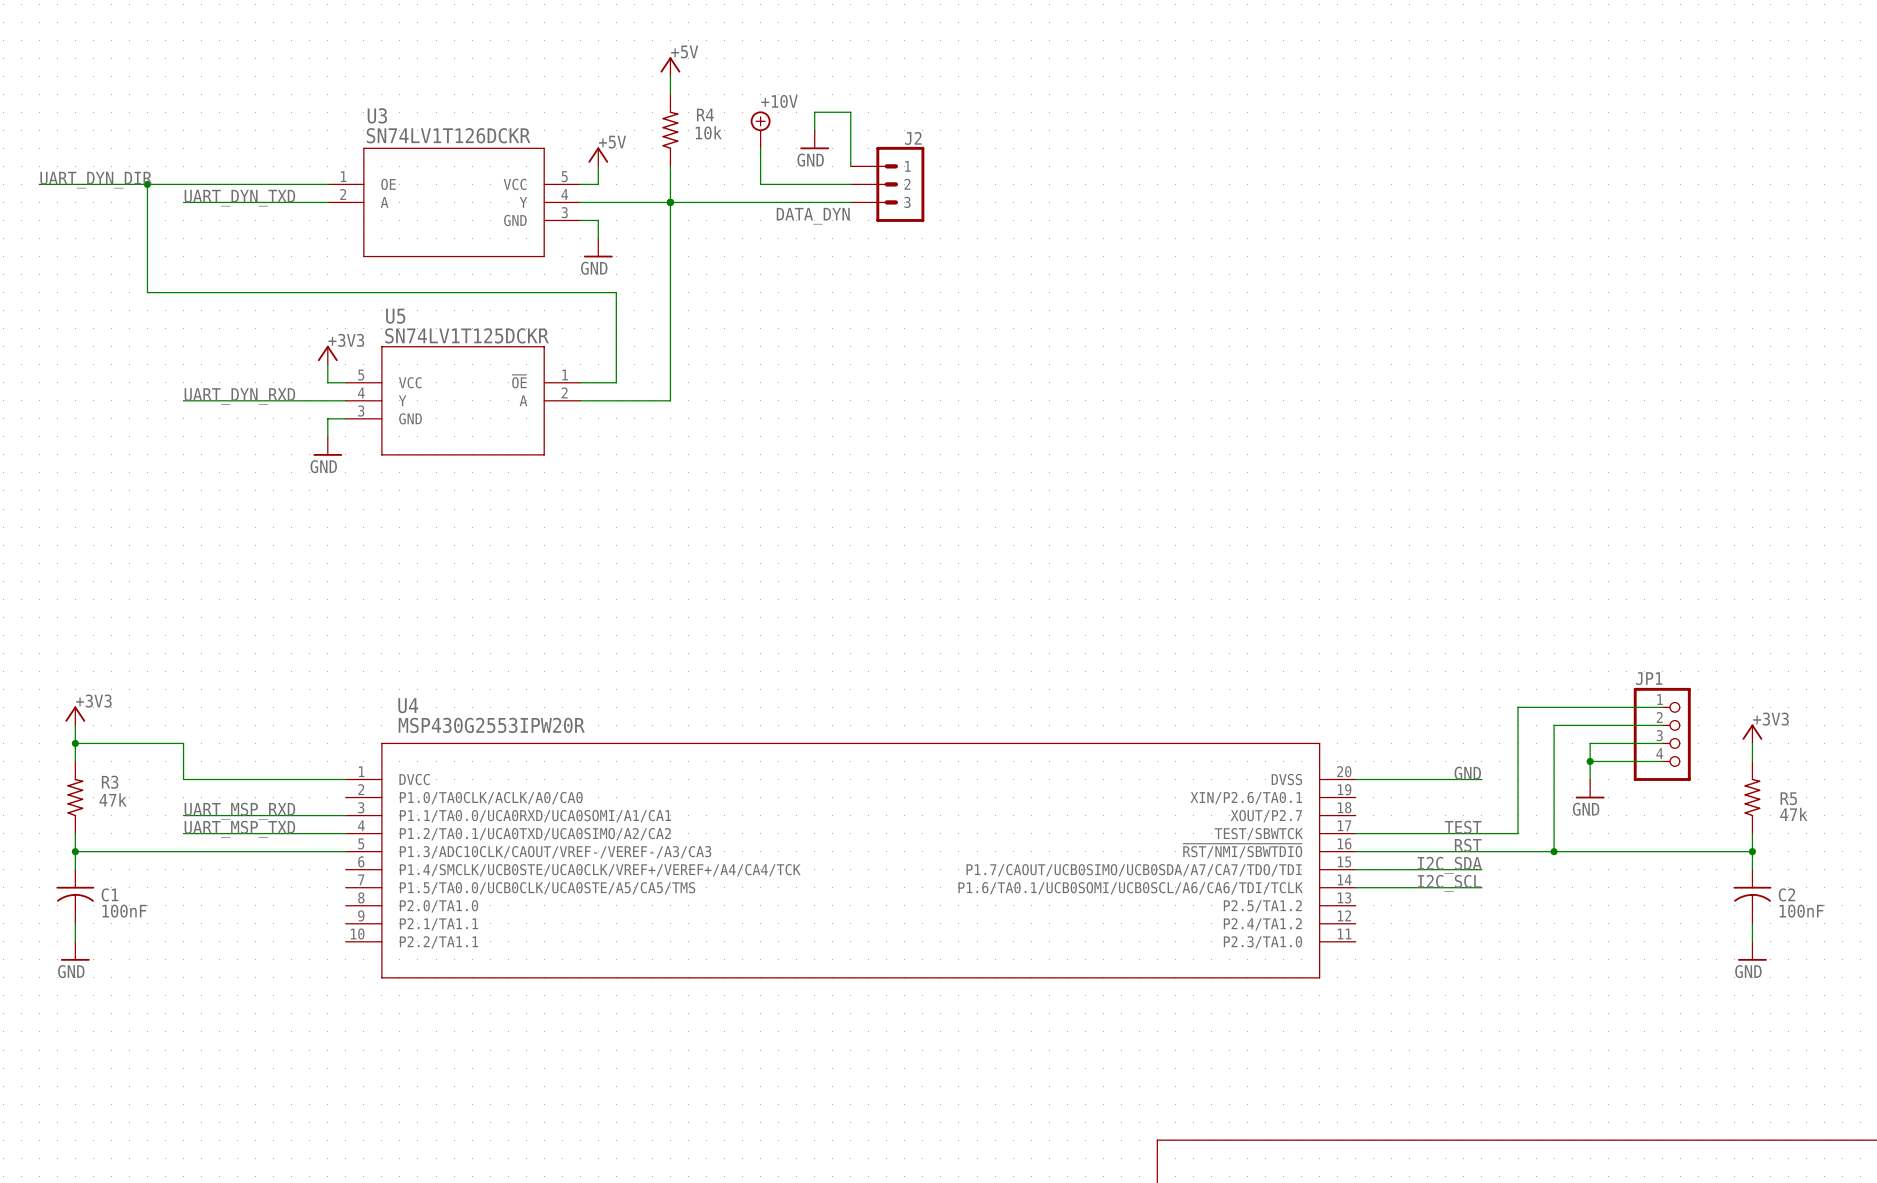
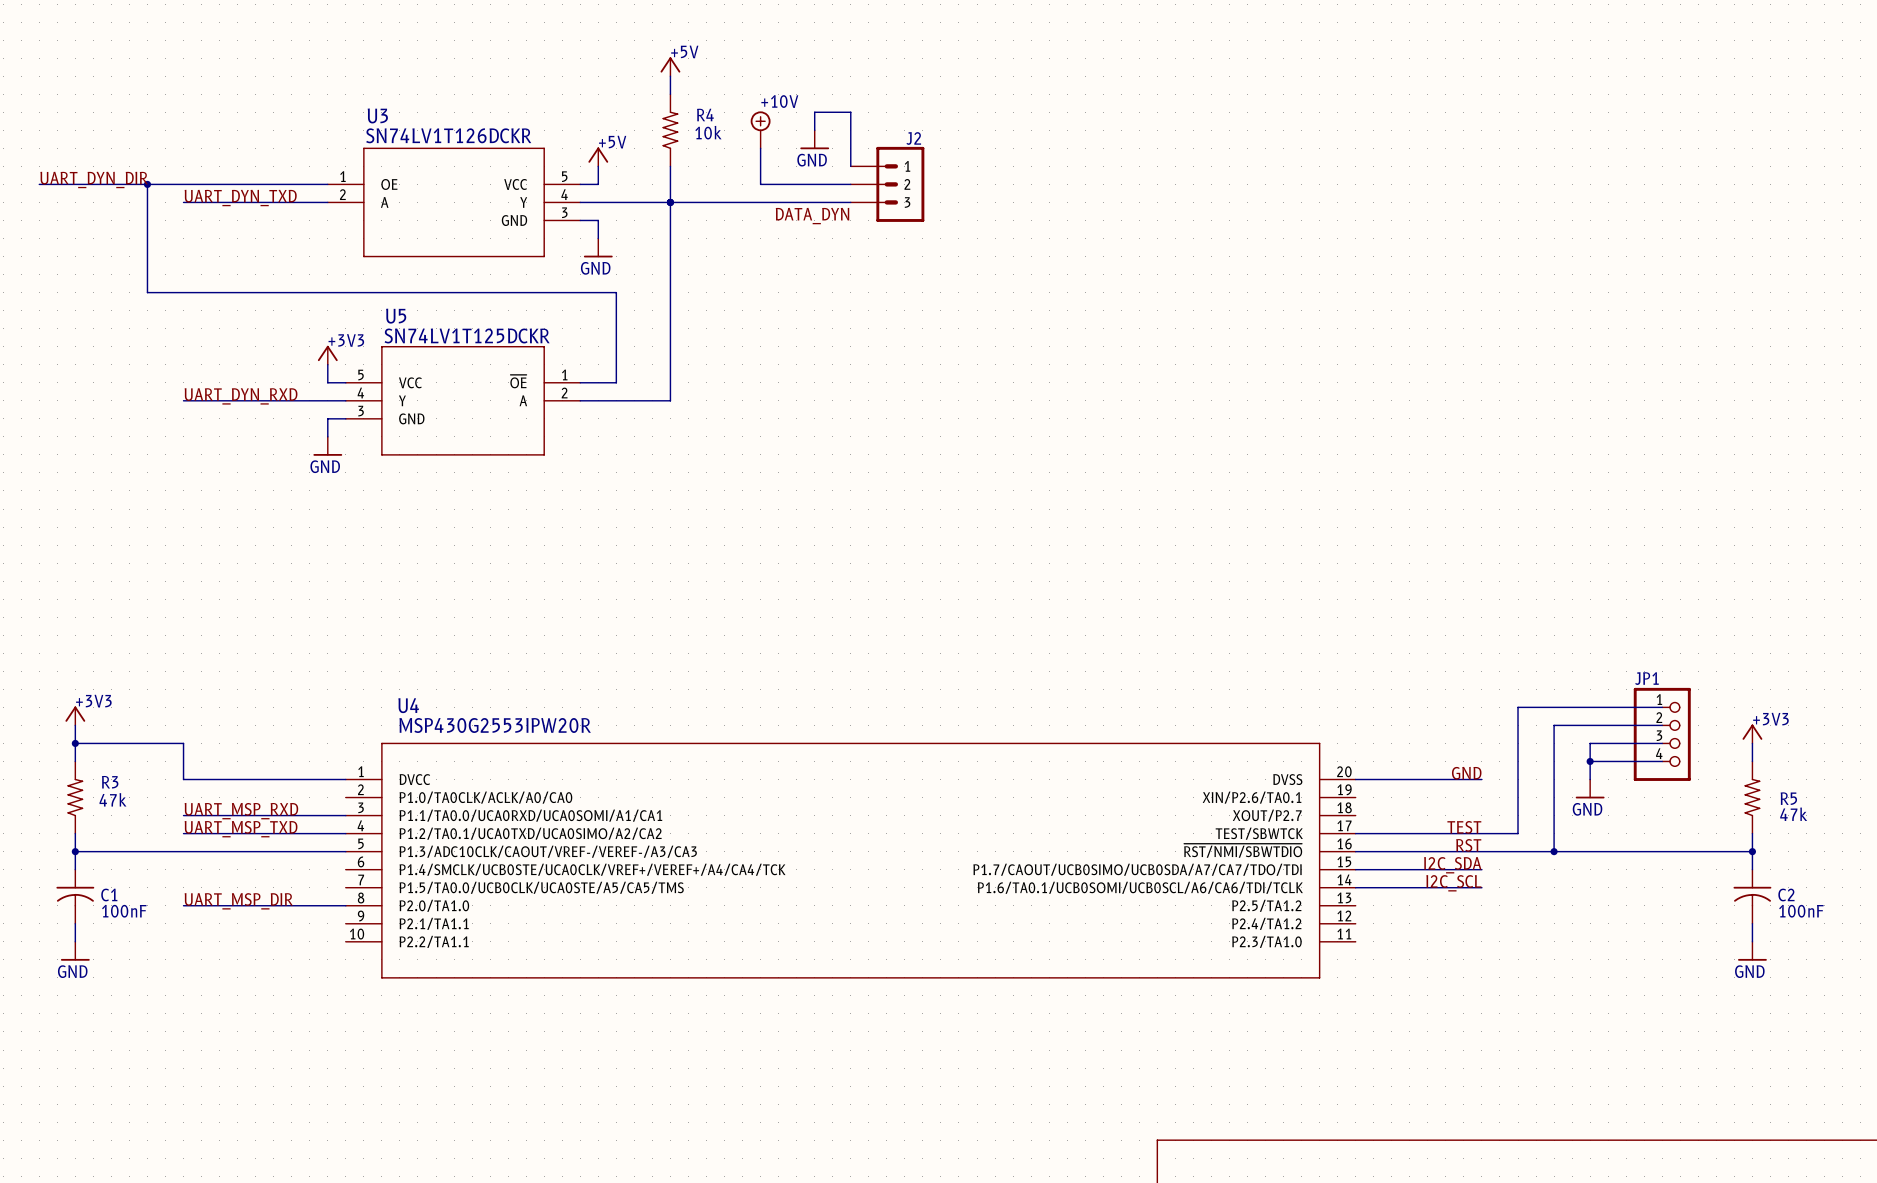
label: none -> UART_MSP_DIR (238, 901)
wire: none -> (183, 905) (345, 905)

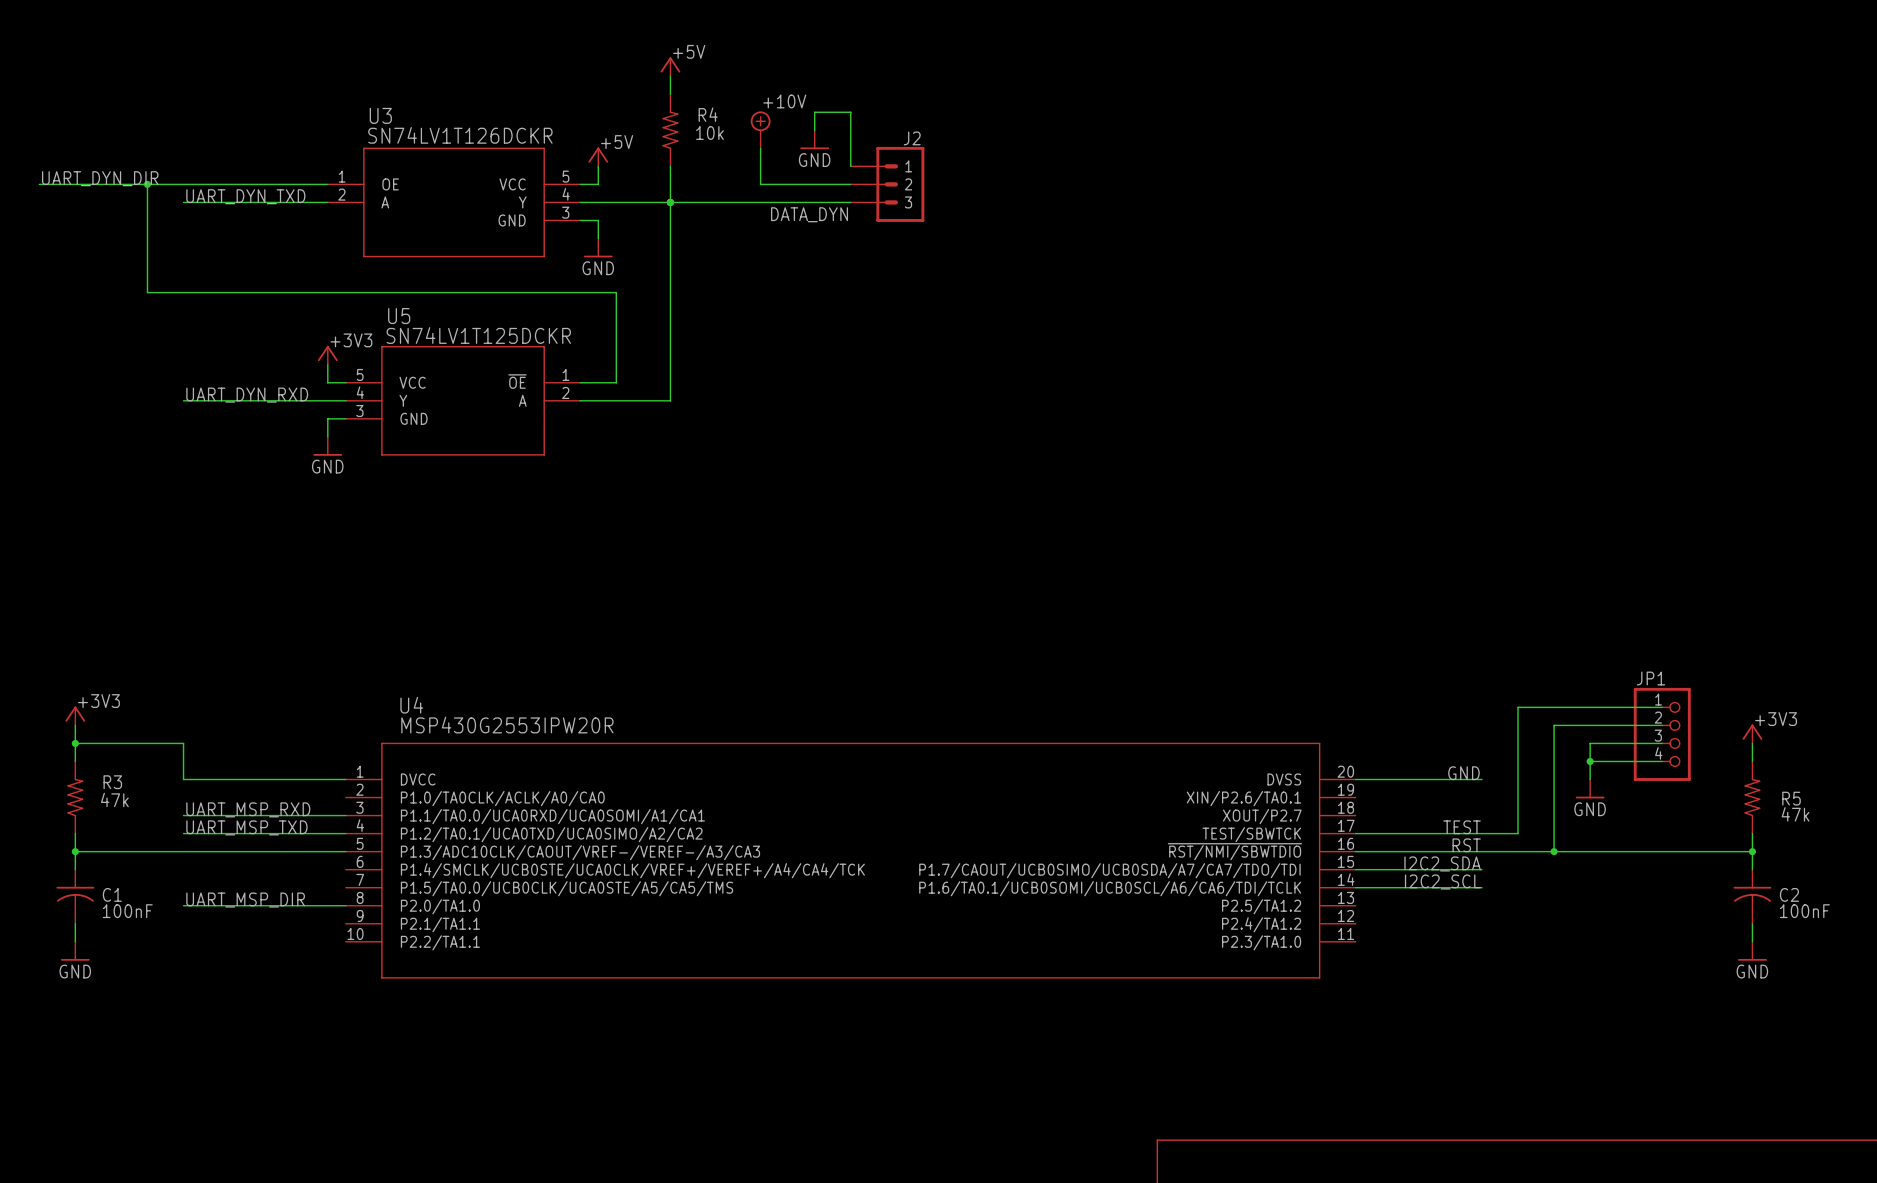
label: I2C_SDA (1452, 865) -> I2C2_SDA (1442, 863)
label: I2C_SCL (1453, 883) -> I2C2_SCL (1442, 881)

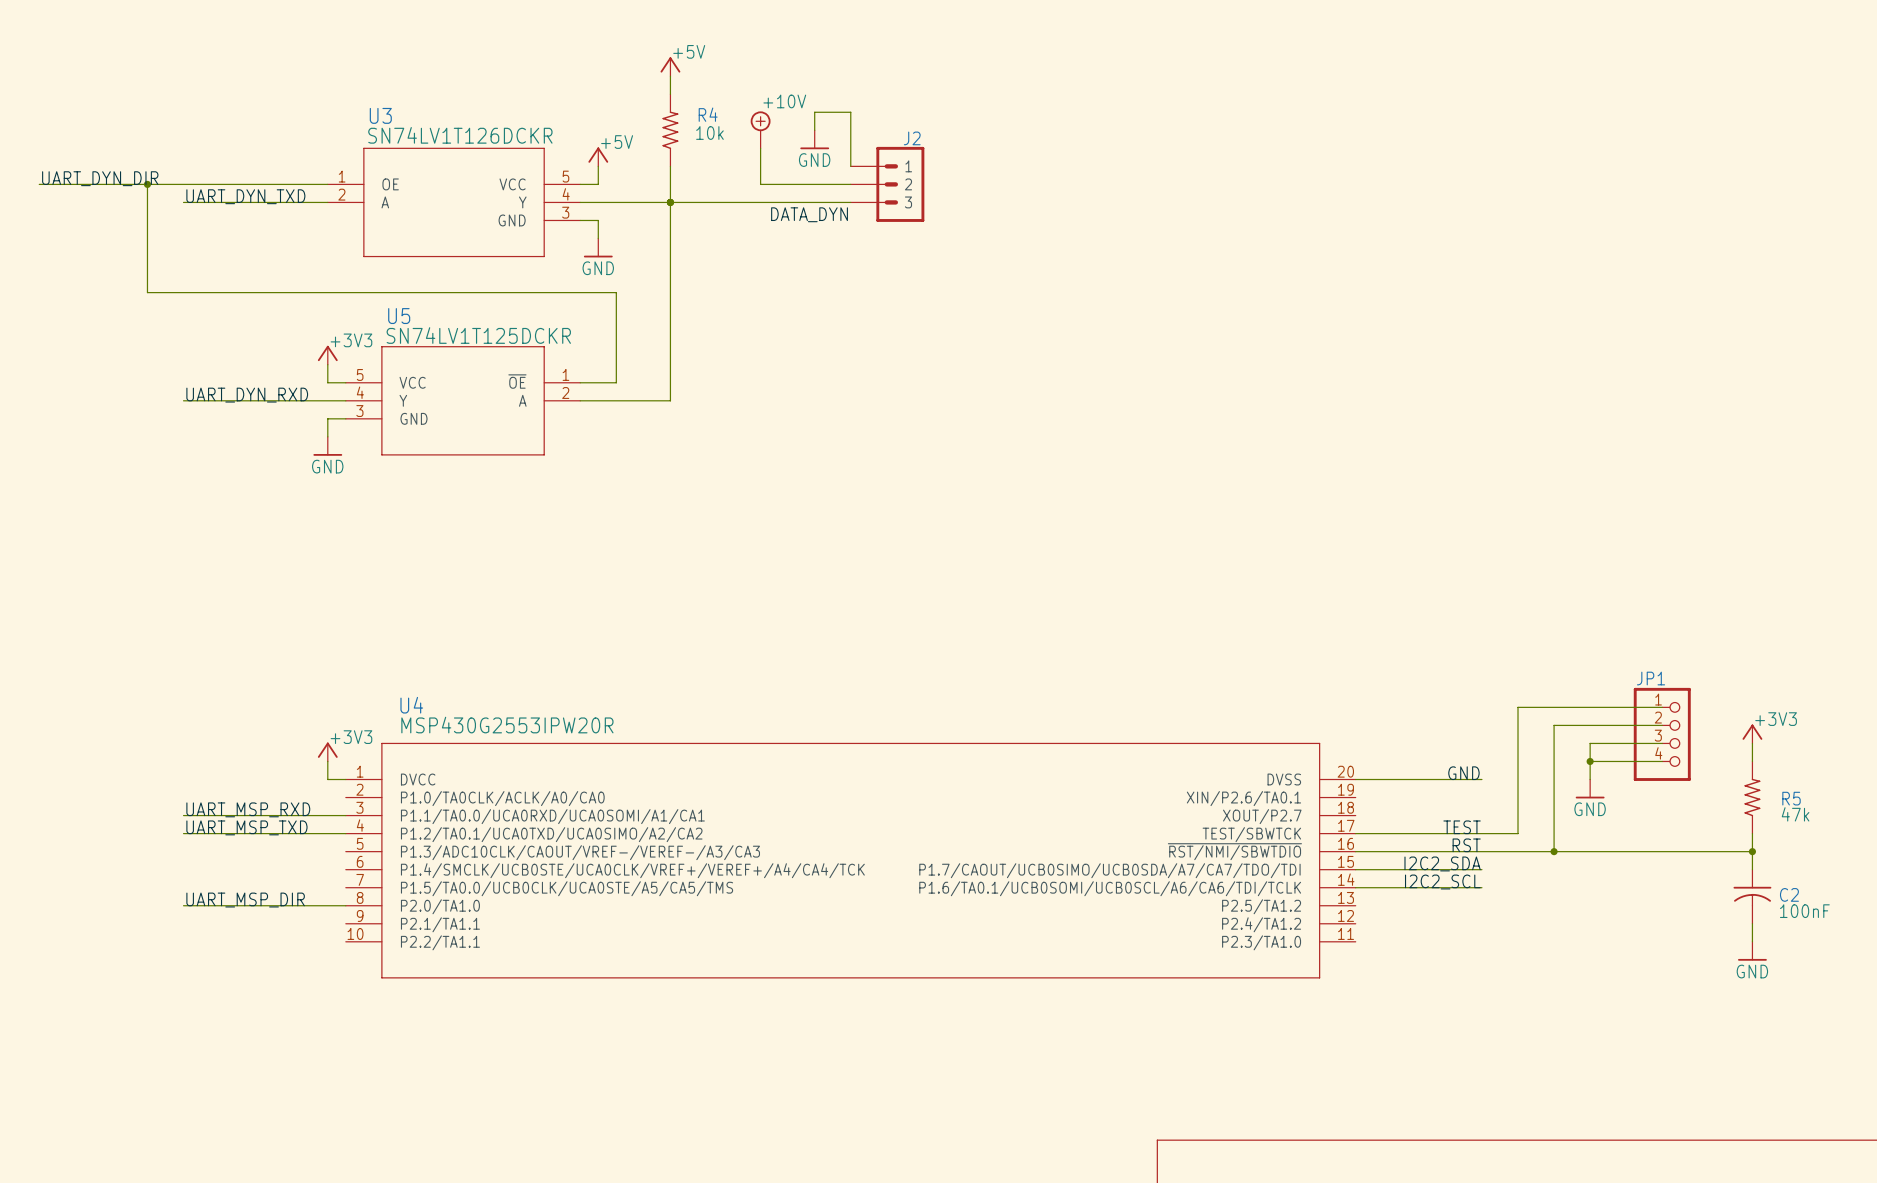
power symbol: +3V3 (75, 715) -> none
wire: (75, 725) (75, 761) -> none
wire: (75, 743) (183, 743) (183, 779) (327, 779) -> (327, 761) (327, 779)
junction: (75, 743) -> none
power symbol: none -> +3V3 (327, 752)
R3: 47k (75, 797) -> none
wire: (75, 833) (75, 869) -> none
wire: (75, 851) (345, 851) -> none
junction: (75, 851) -> none
C1: 100nF (75, 896) -> none
wire: (75, 923) (75, 941) -> none
power symbol: GND (75, 951) -> none

